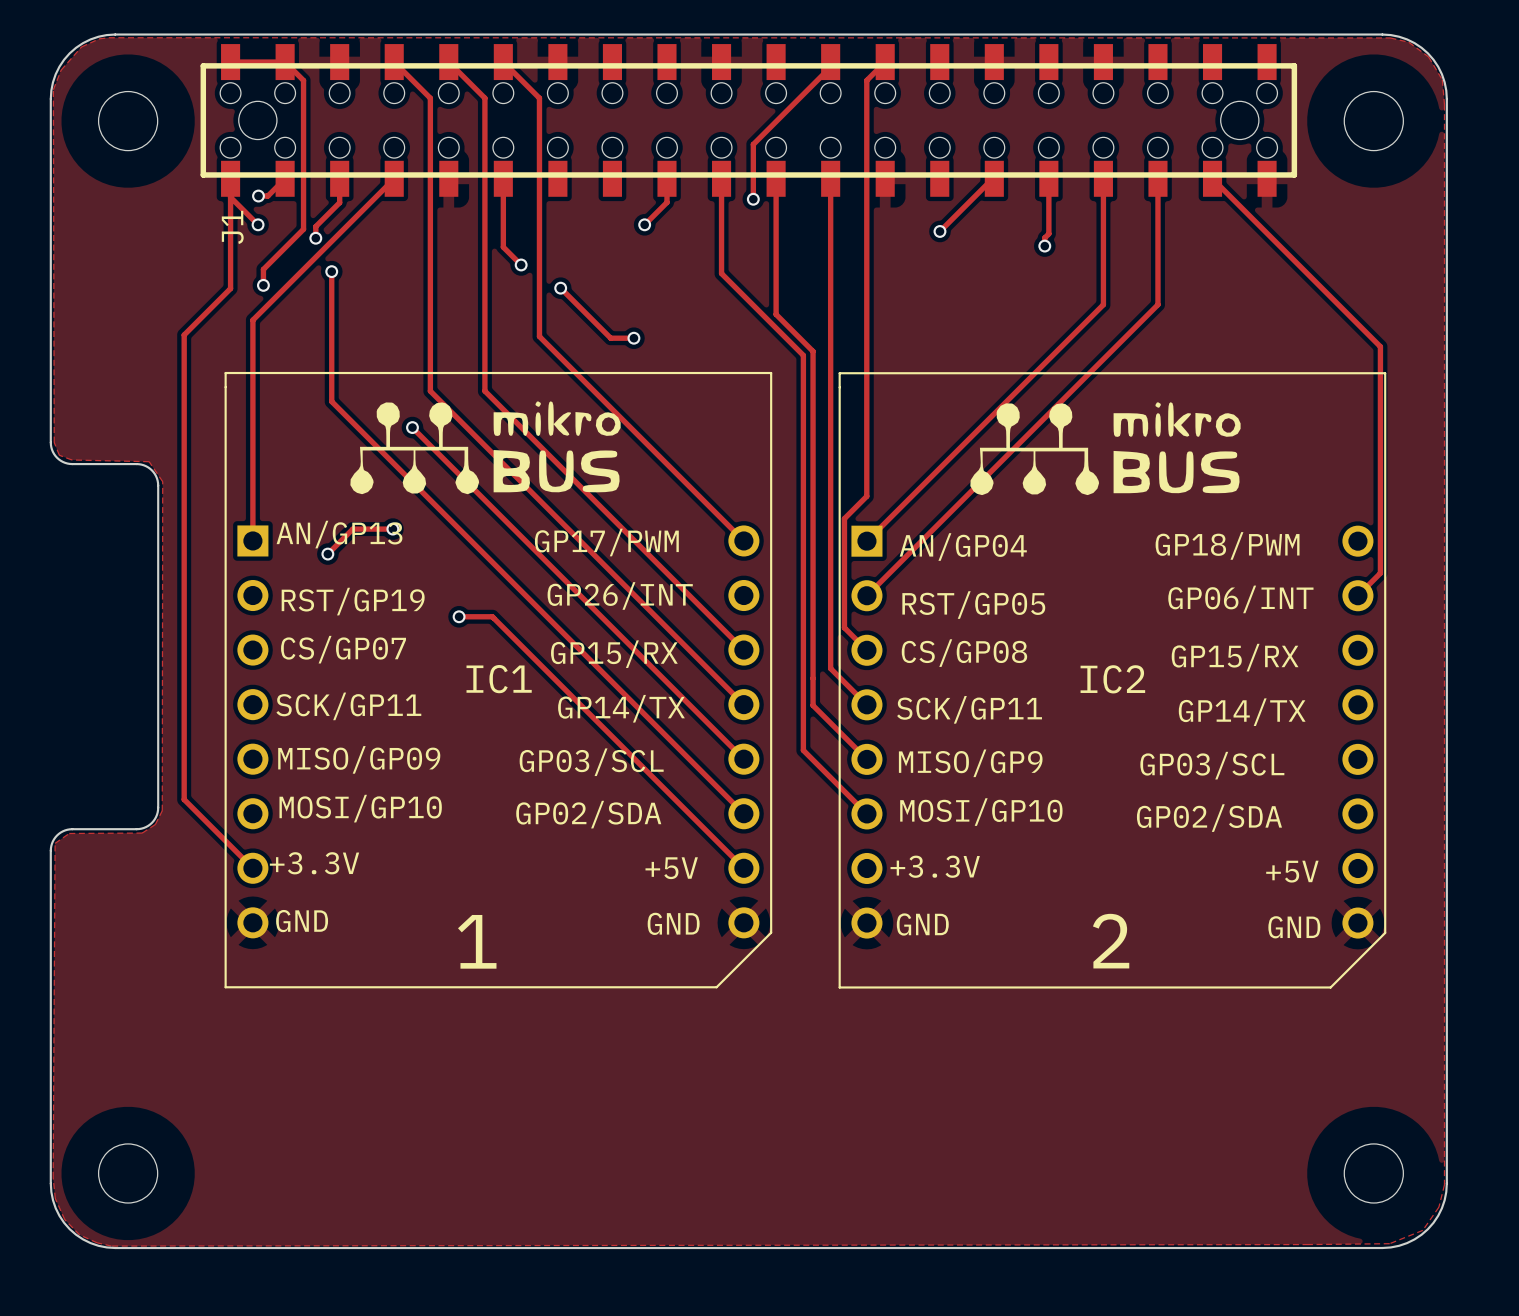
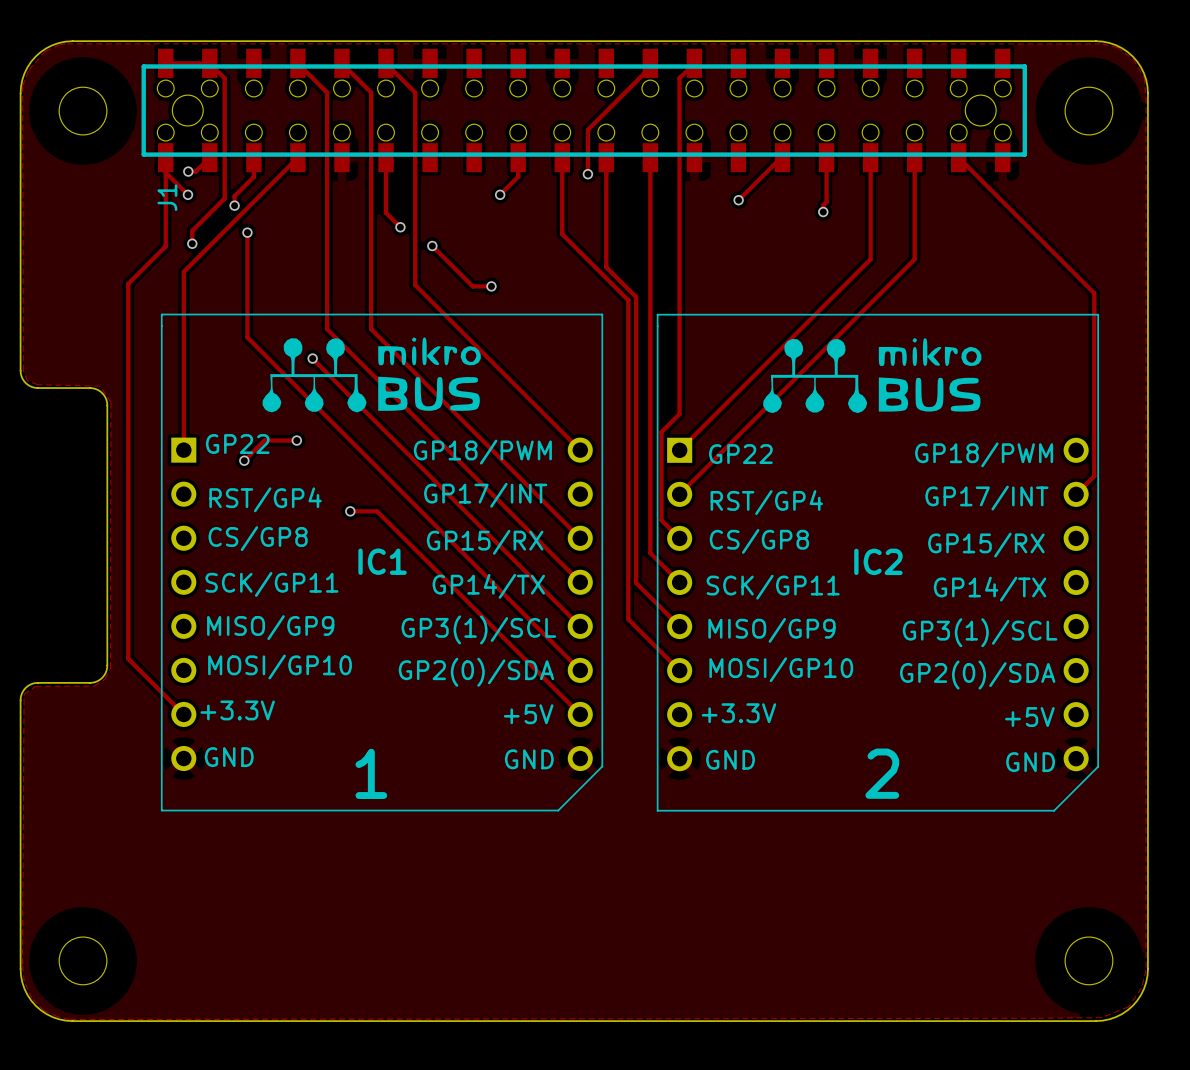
text: AN/GP13 (339, 534) -> GP22 (237, 444)
text: GP17/PWM (606, 542) -> GP18/PWM (482, 452)
text: AN/GP04 (963, 547) -> GP22 (740, 454)
text: GP26/INT (620, 595) -> GP17/INT (485, 495)
text: GP06/INT (1240, 599) -> GP17/INT (986, 498)
text: RST/GP19 (353, 601) -> RST/GP4 (265, 499)
text: RST/GP05 (973, 605) -> RST/GP4 (766, 502)
text: CS/GP07 (343, 649) -> CS/GP8 (258, 538)
text: CS/GP08 (964, 653) -> CS/GP8 (759, 541)
text: MISO/GP09 (359, 759) -> MISO/GP9 (270, 627)
text: GP03/SCL (591, 762) -> GP3(1)/SCL (478, 629)
text: GP03/SCL (1212, 765) -> GP3(1)/SCL (980, 632)
text: GP02/SDA (588, 814) -> GP2(0)/SDA (476, 672)
text: GP02/SDA (1209, 818) -> GP2(0)/SDA (977, 675)

